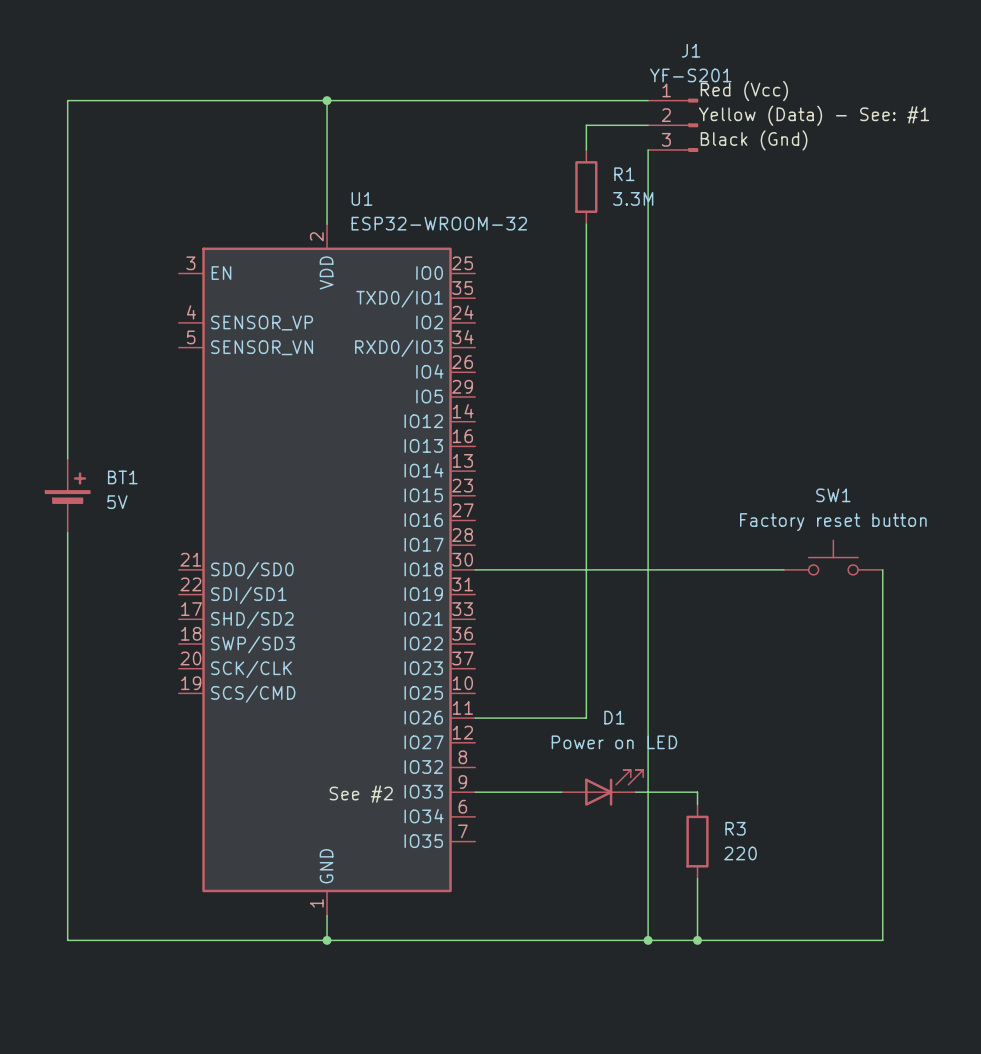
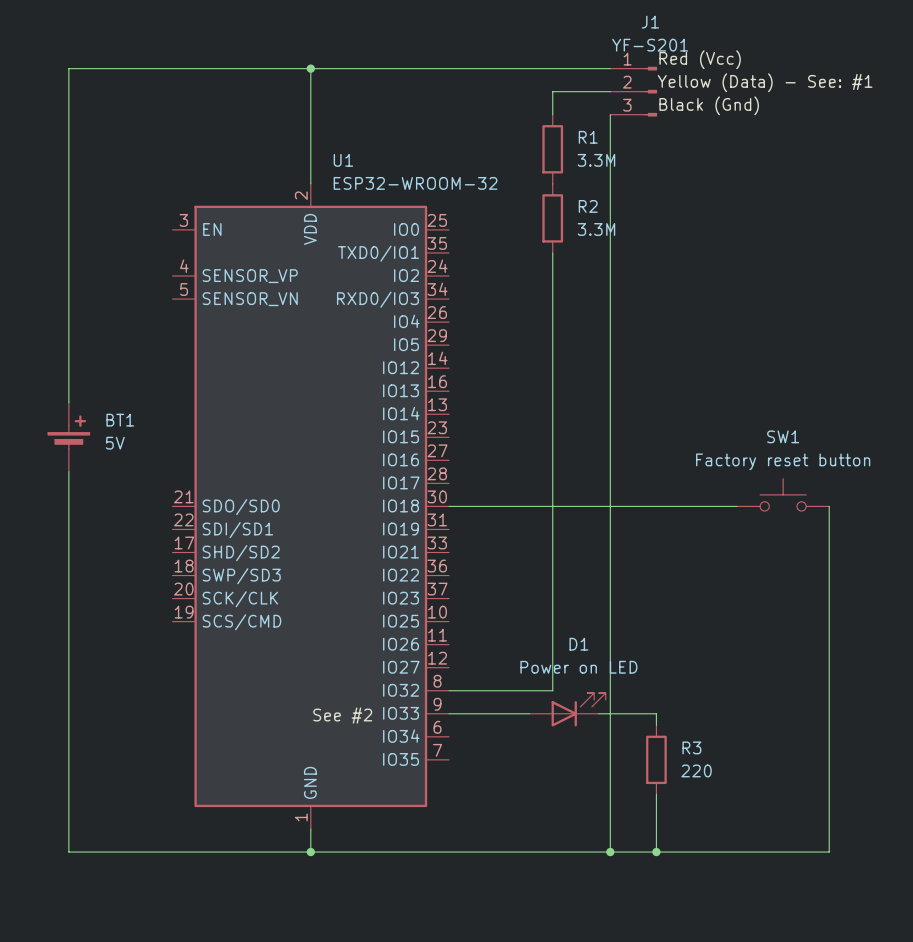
wire: (586, 224) (586, 298) -> none
R2: none -> 3.3M (552, 218)
wire: (475, 718) (586, 718) -> (449, 690) (552, 690) (552, 644)

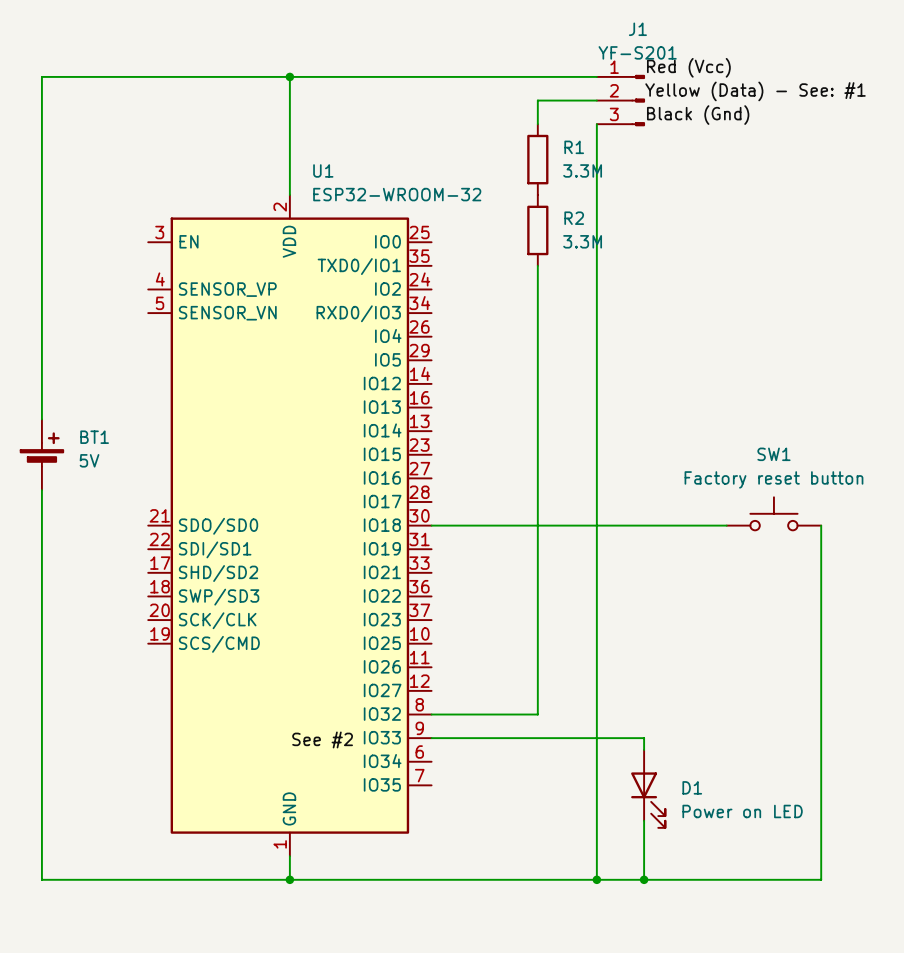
D1 name position: D1 (578, 644) -> D1 (692, 787)
D1 value position: Power on LED (578, 667) -> Power on LED (742, 811)
D1 position: (567, 709) -> (648, 788)
D1 rotation: 0° (578, 709) -> 90° clockwise (648, 800)
R3: 220 (656, 759) -> none

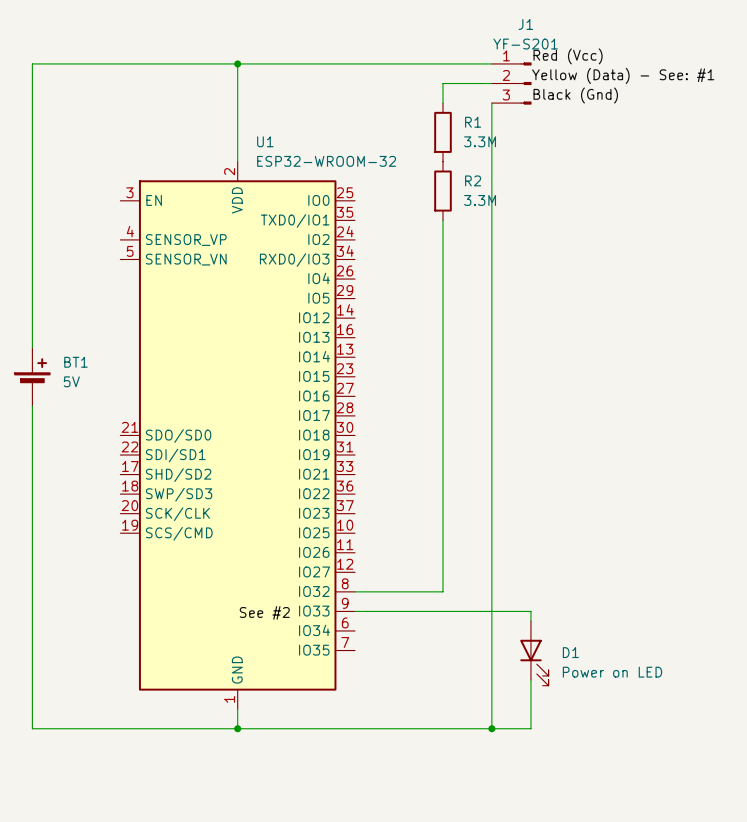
SW1: Factory reset button (773, 513) -> none
wire: (431, 525) (726, 525) -> none
wire: (821, 525) (821, 879) (644, 879) -> none
junction: (644, 879) -> none

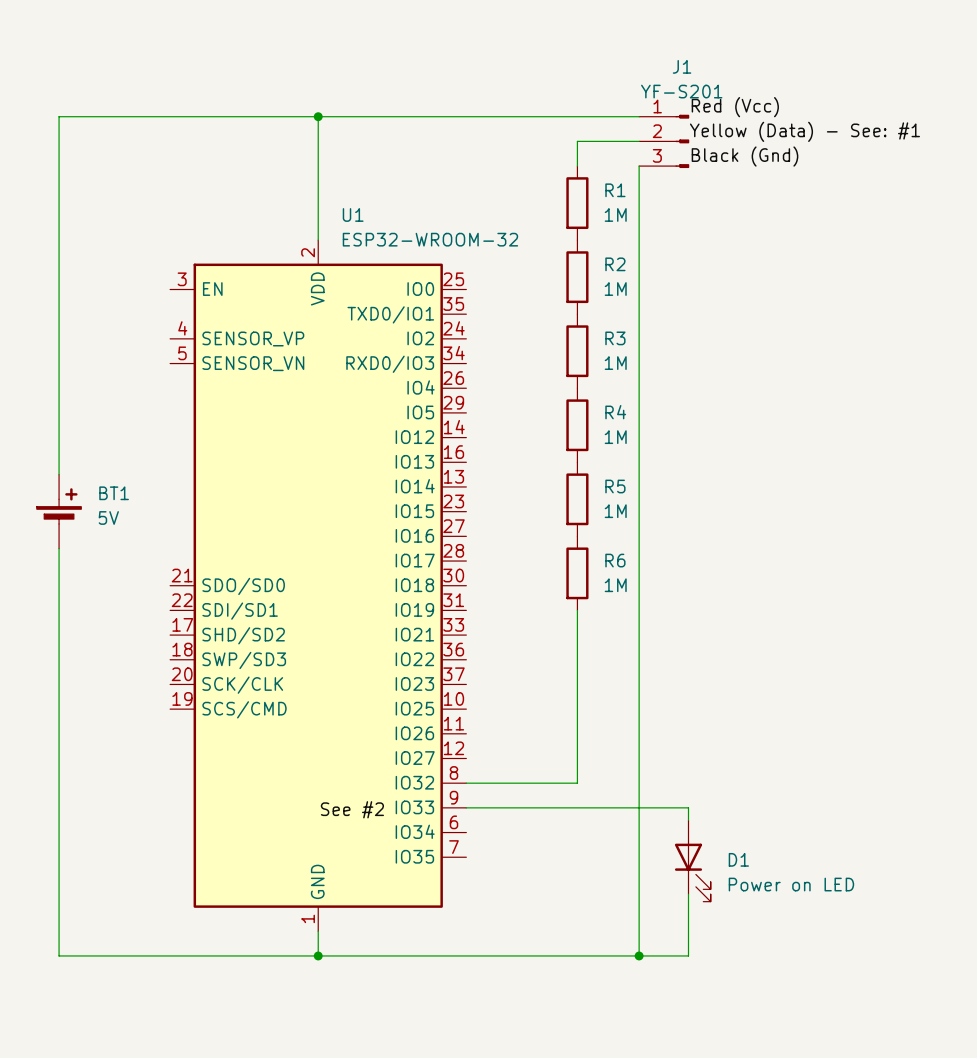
R1 value: 3.3M (480, 141) -> 1M (615, 214)
R2 value: 3.3M (480, 200) -> 1M (615, 289)
wire: (442, 220) (442, 455) -> none
R3: none -> 1M (577, 351)
R4: none -> 1M (577, 425)
R5: none -> 1M (577, 499)
R6: none -> 1M (577, 573)

